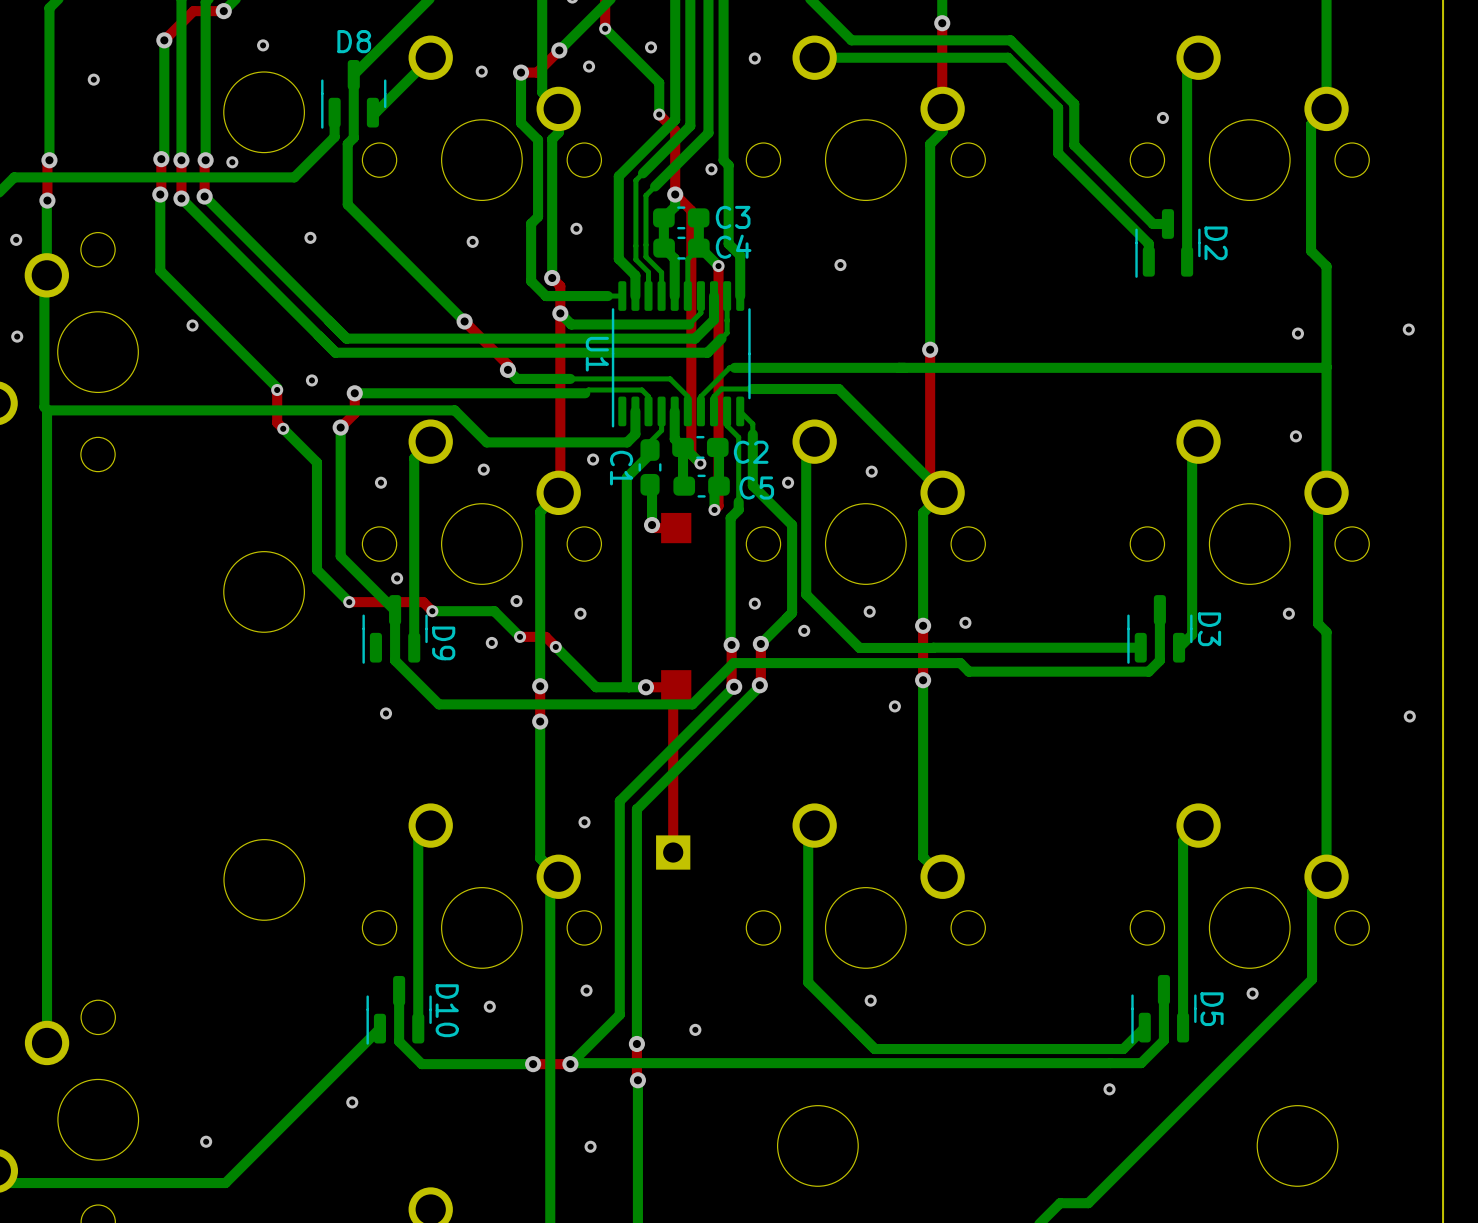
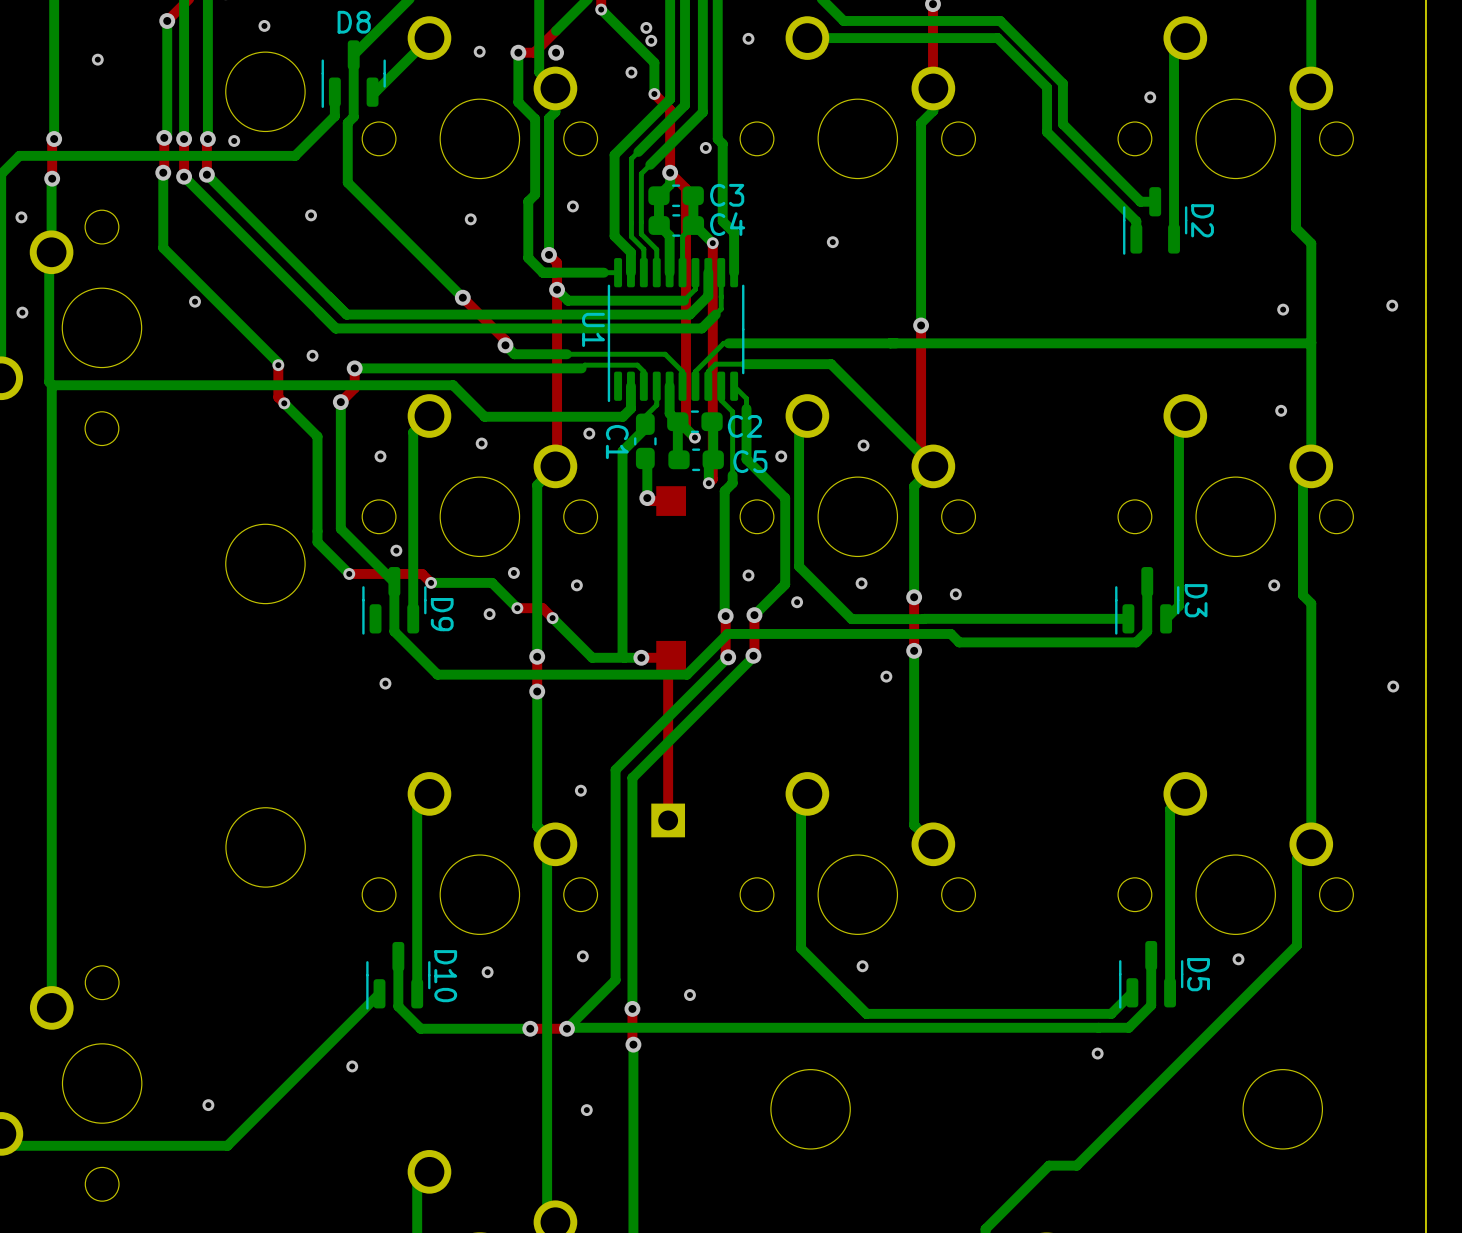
via position: (559, 50) -> (556, 52)
via: none -> (651, 40)
via: (589, 66) -> none
via: none -> (631, 72)

